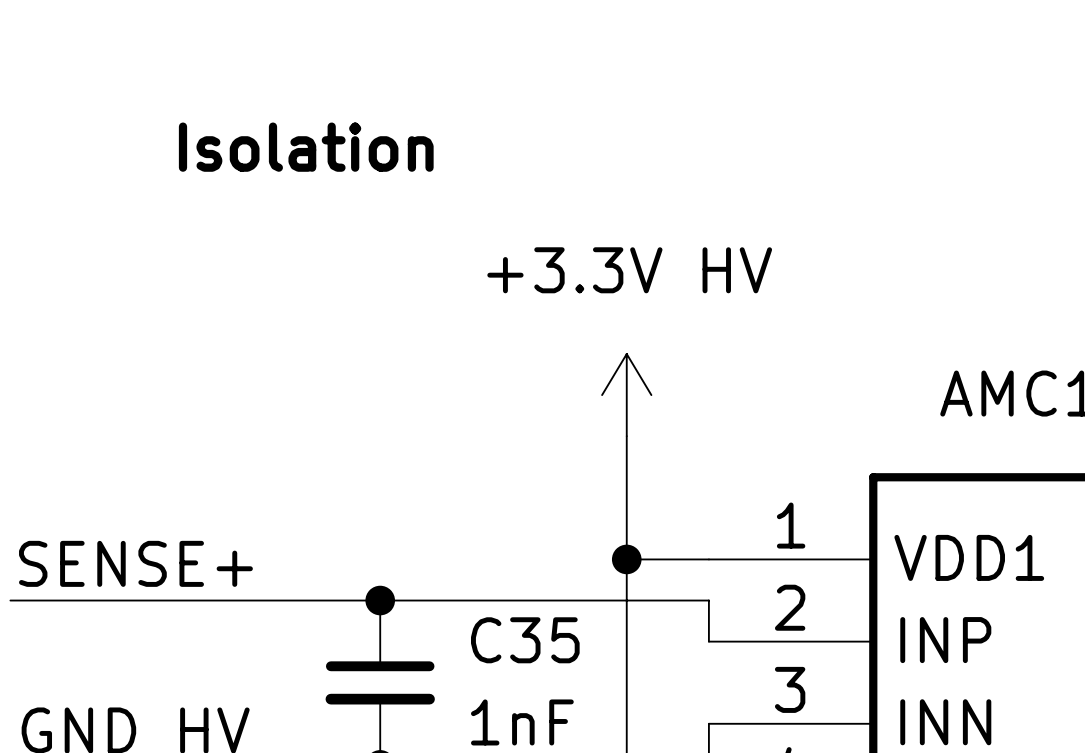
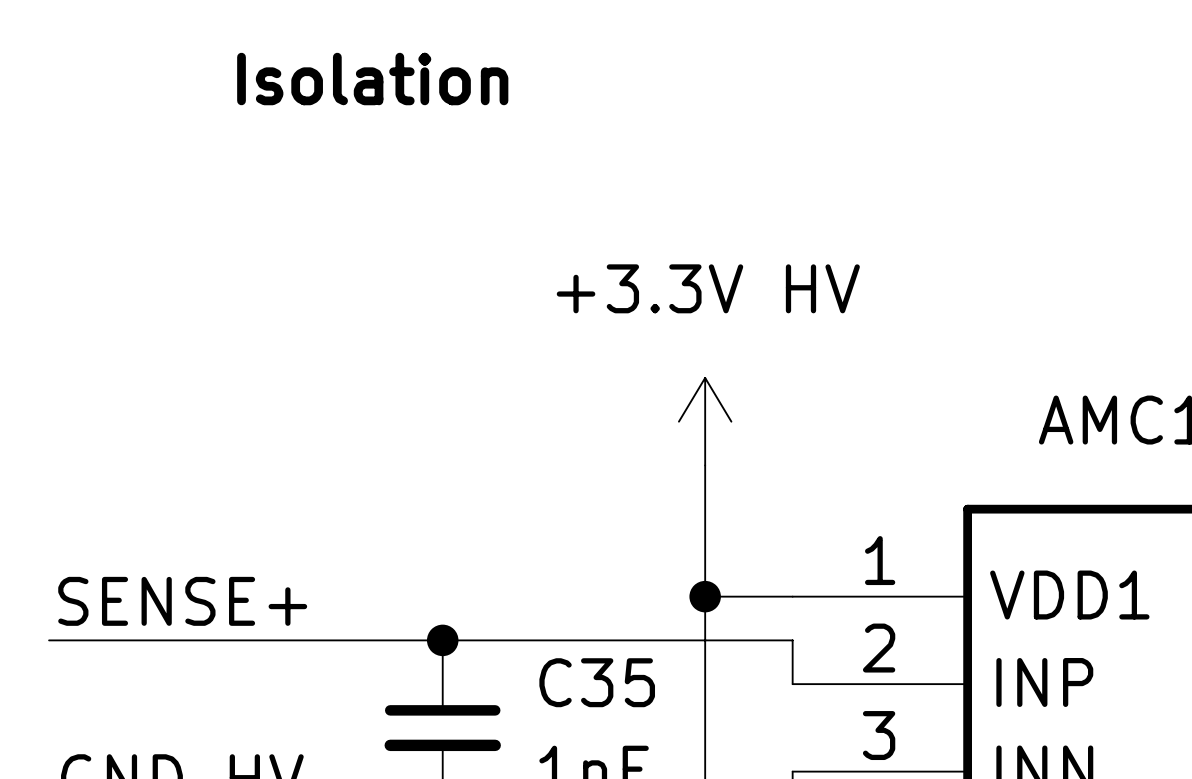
text position: Isolation (306, 147) -> Isolation (372, 79)

